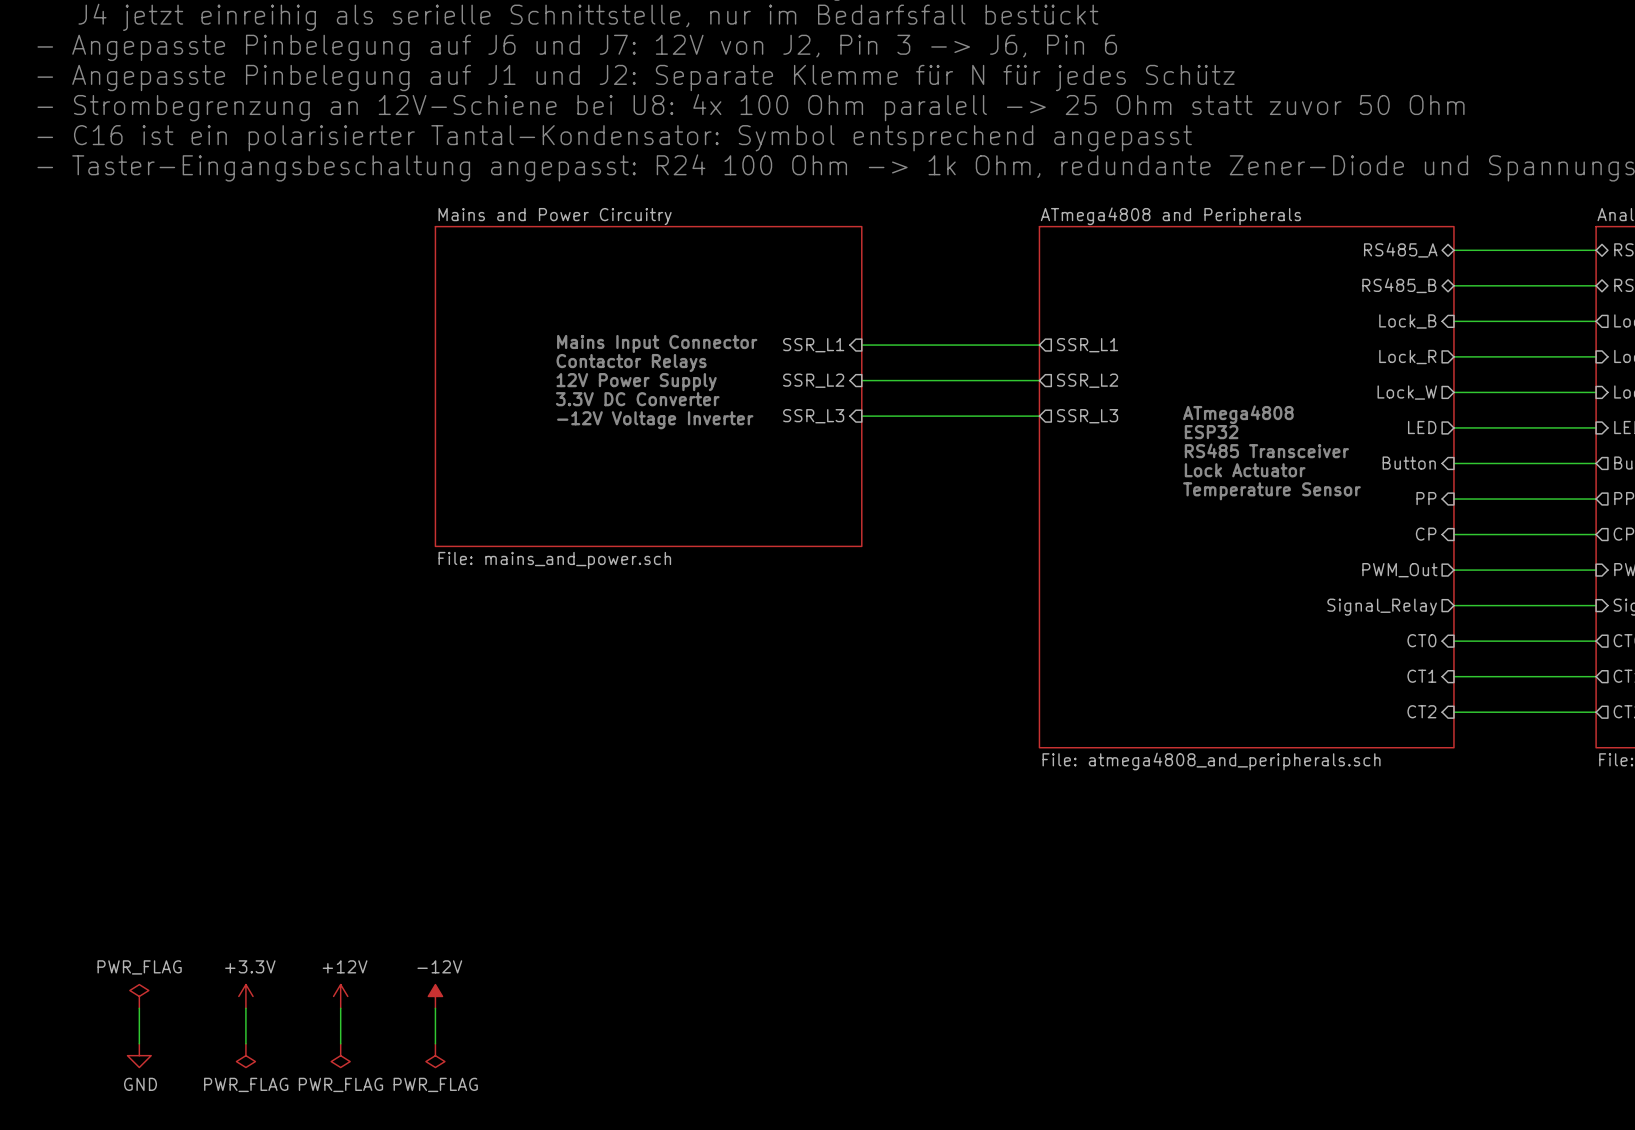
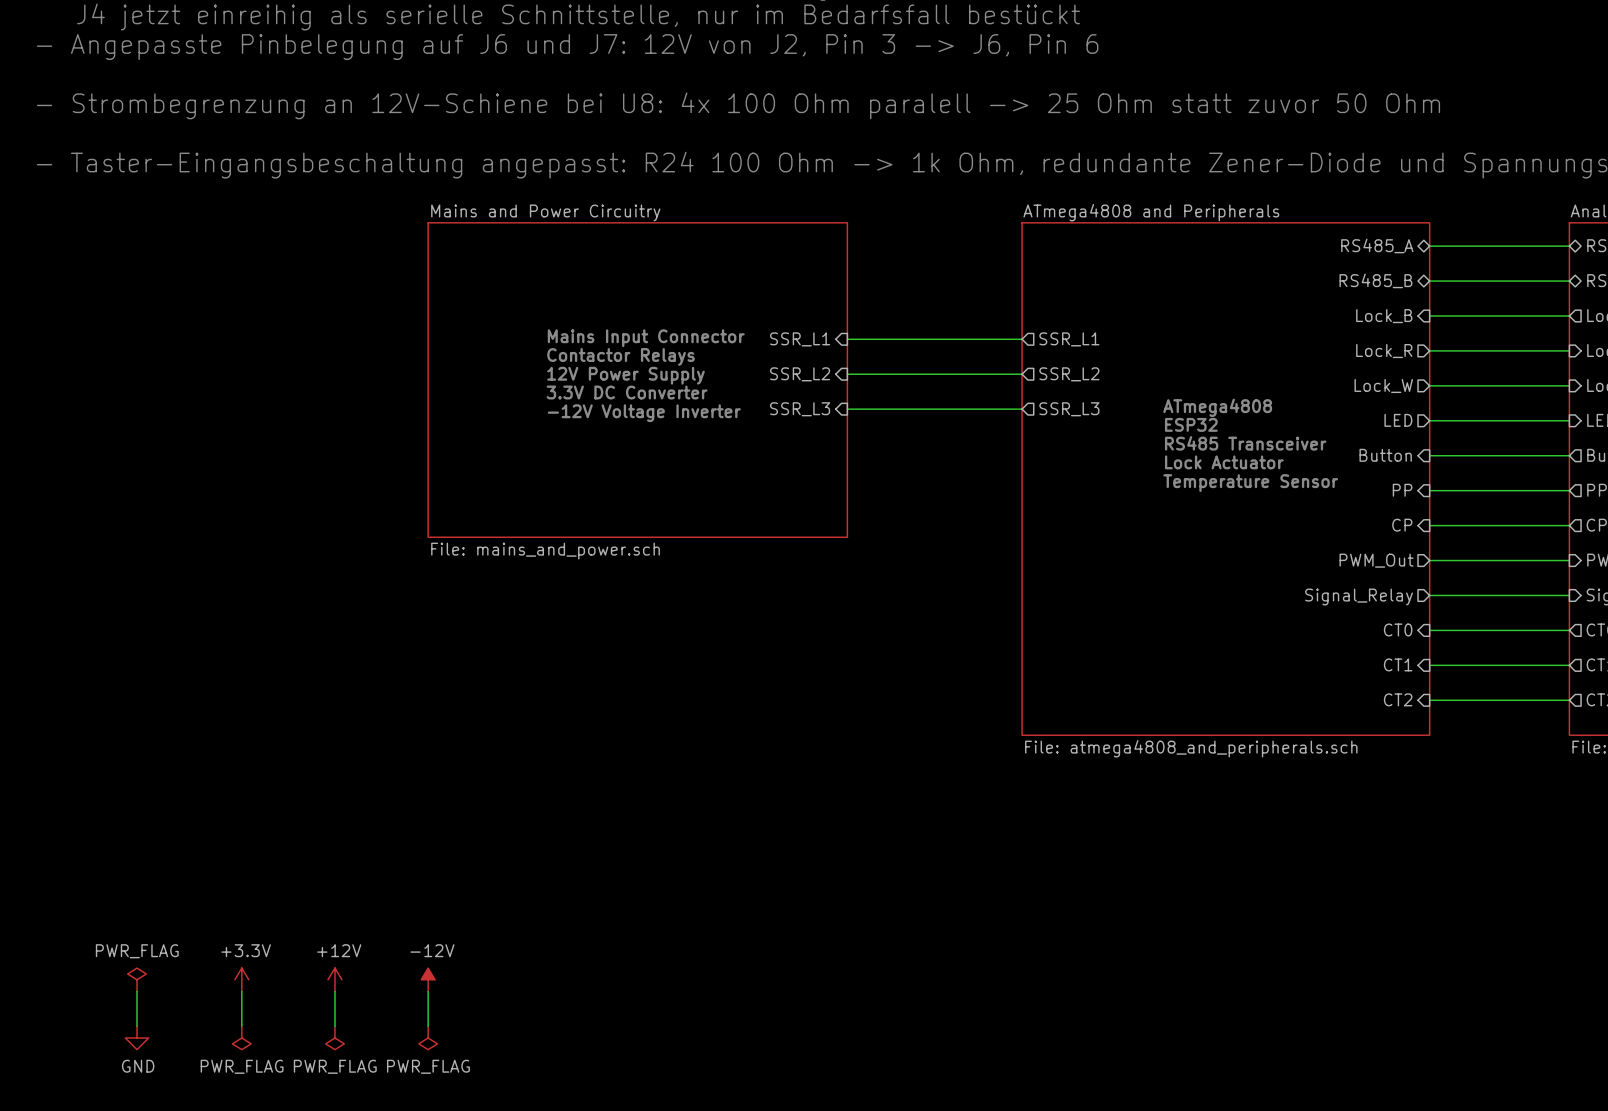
text: - Angepasste Pinbelegung auf J1 und J2: Separate Klemme für N für jedes Schütz (636, 78) -> none
text: - C16 ist ein polarisierter Tantal-Kondensator: Symbol entsprechend angepasst (614, 138) -> none

